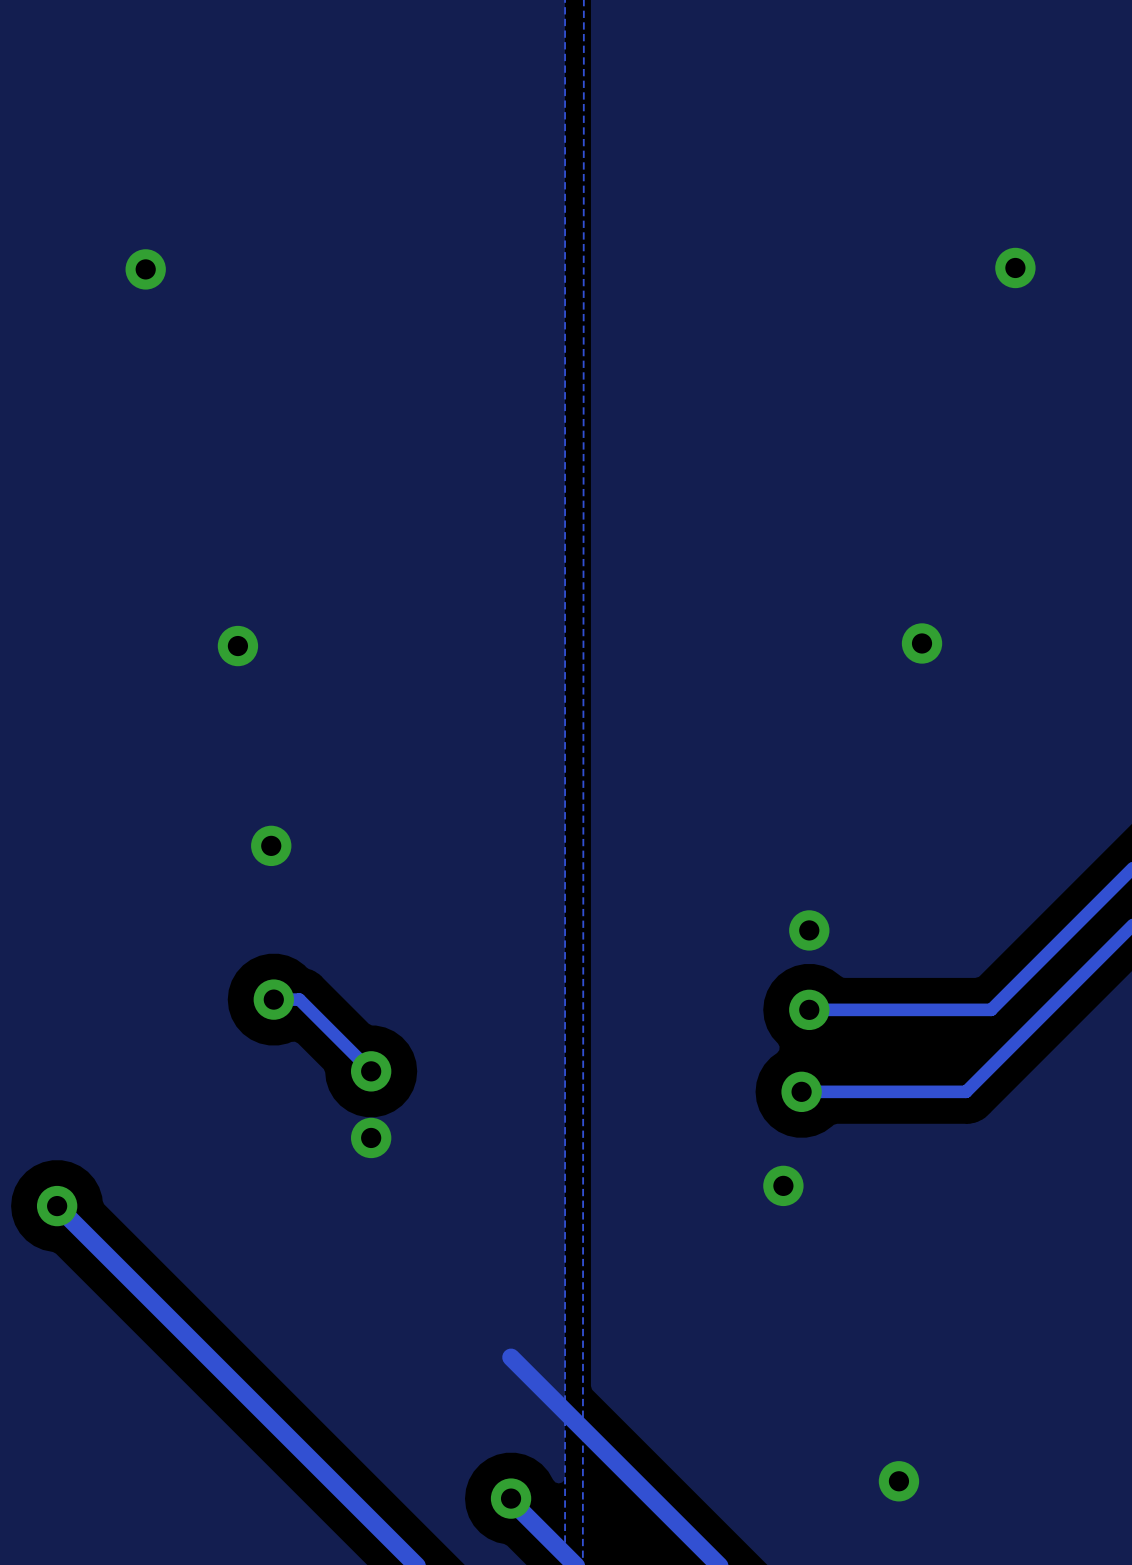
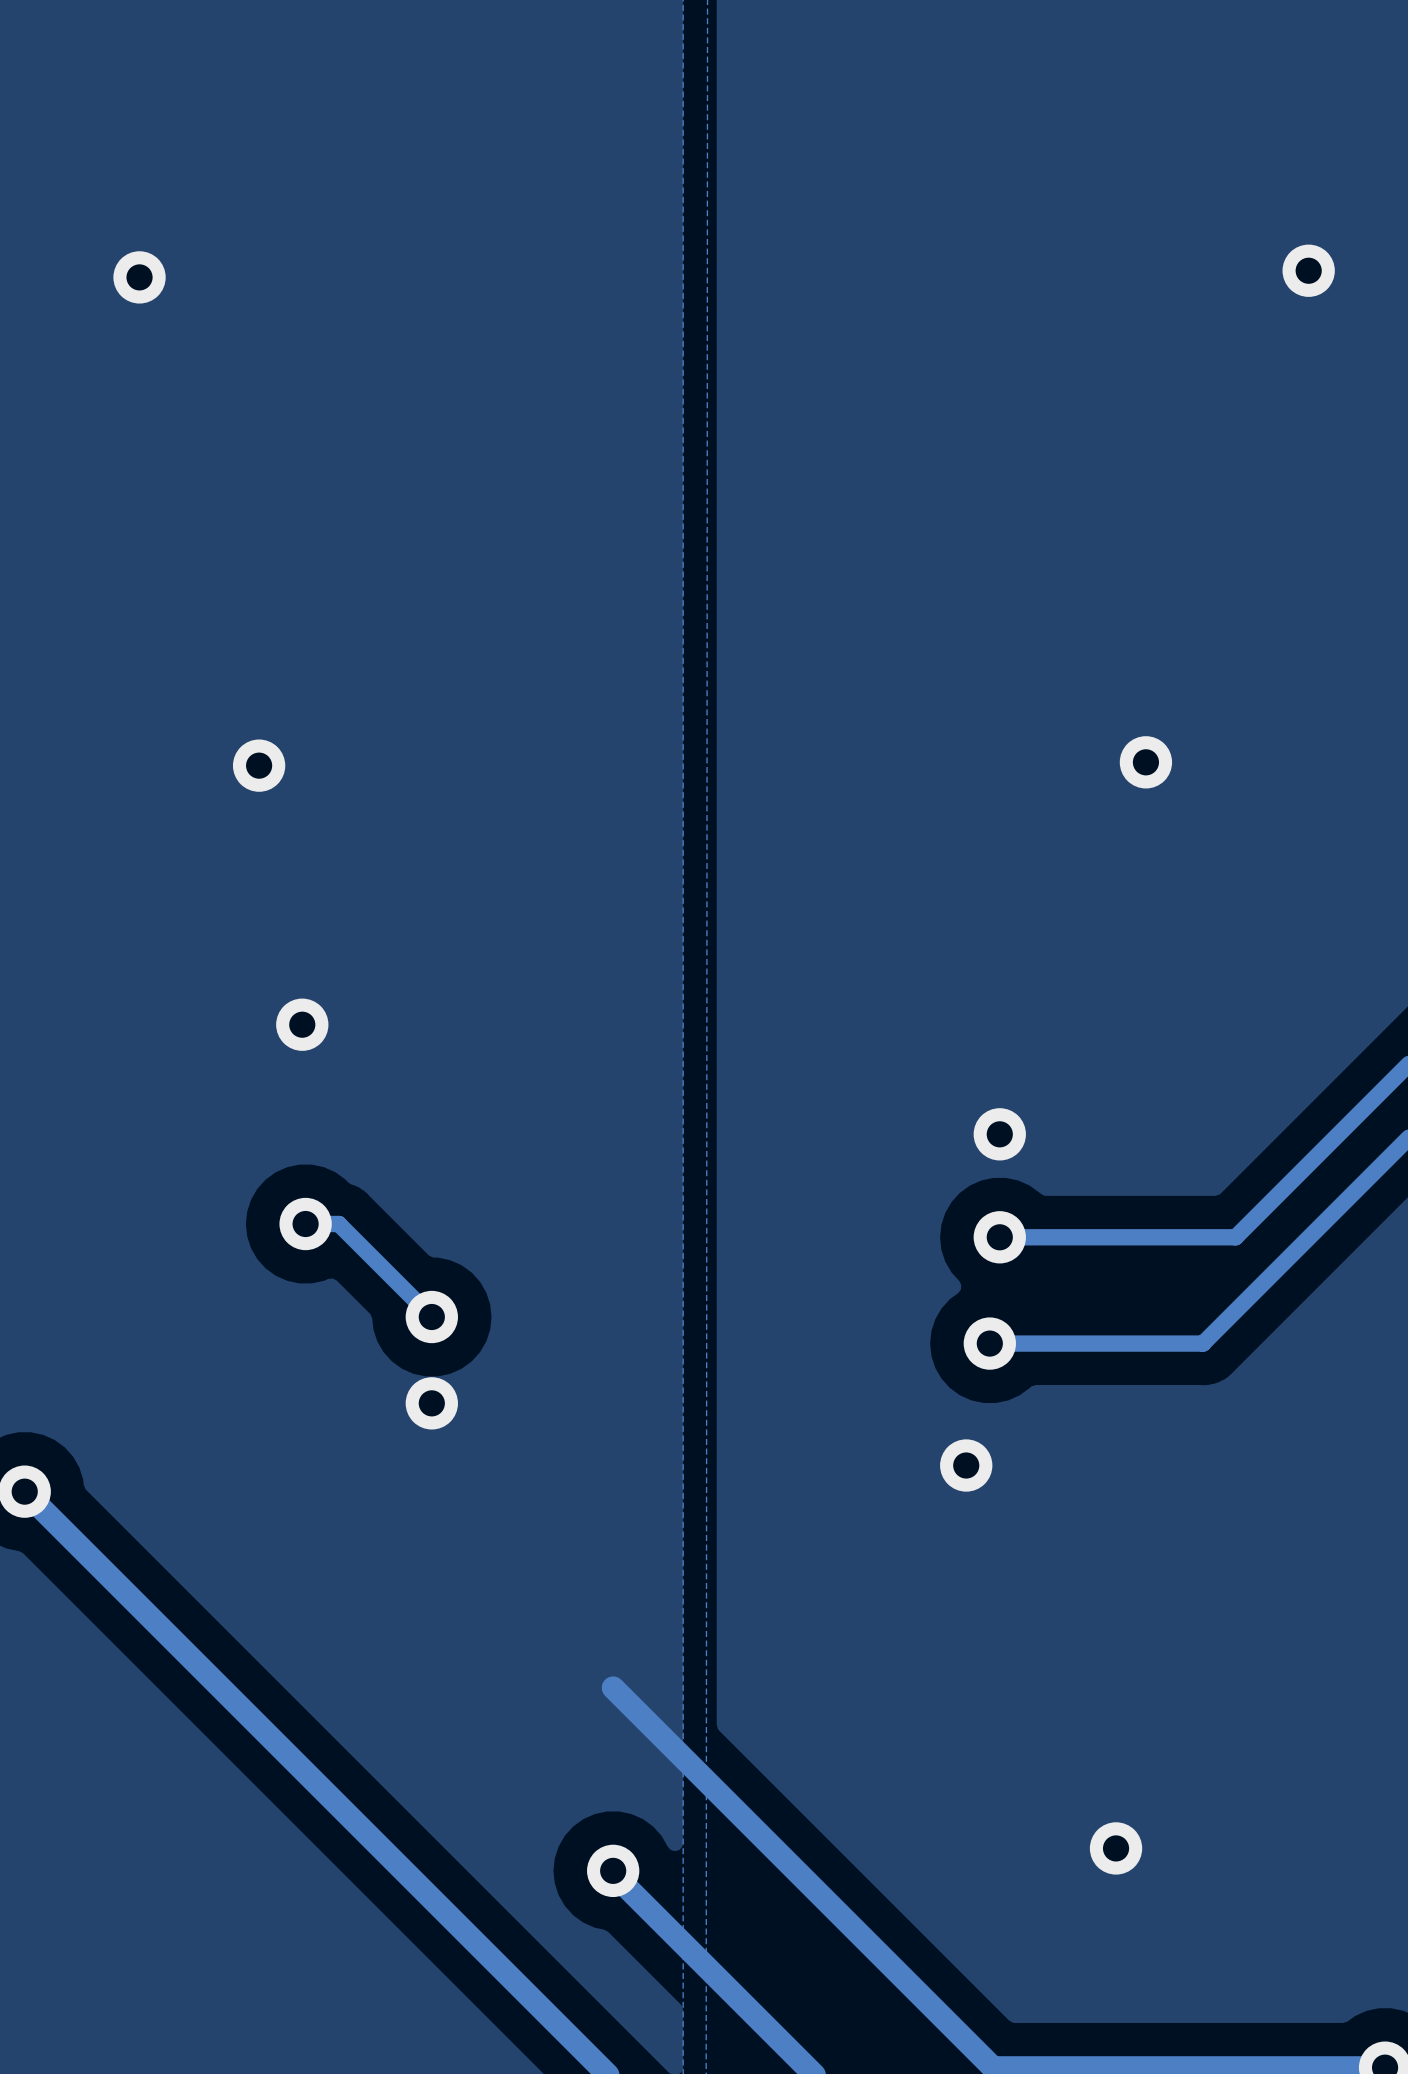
via position: (1015, 267) -> (1308, 270)

